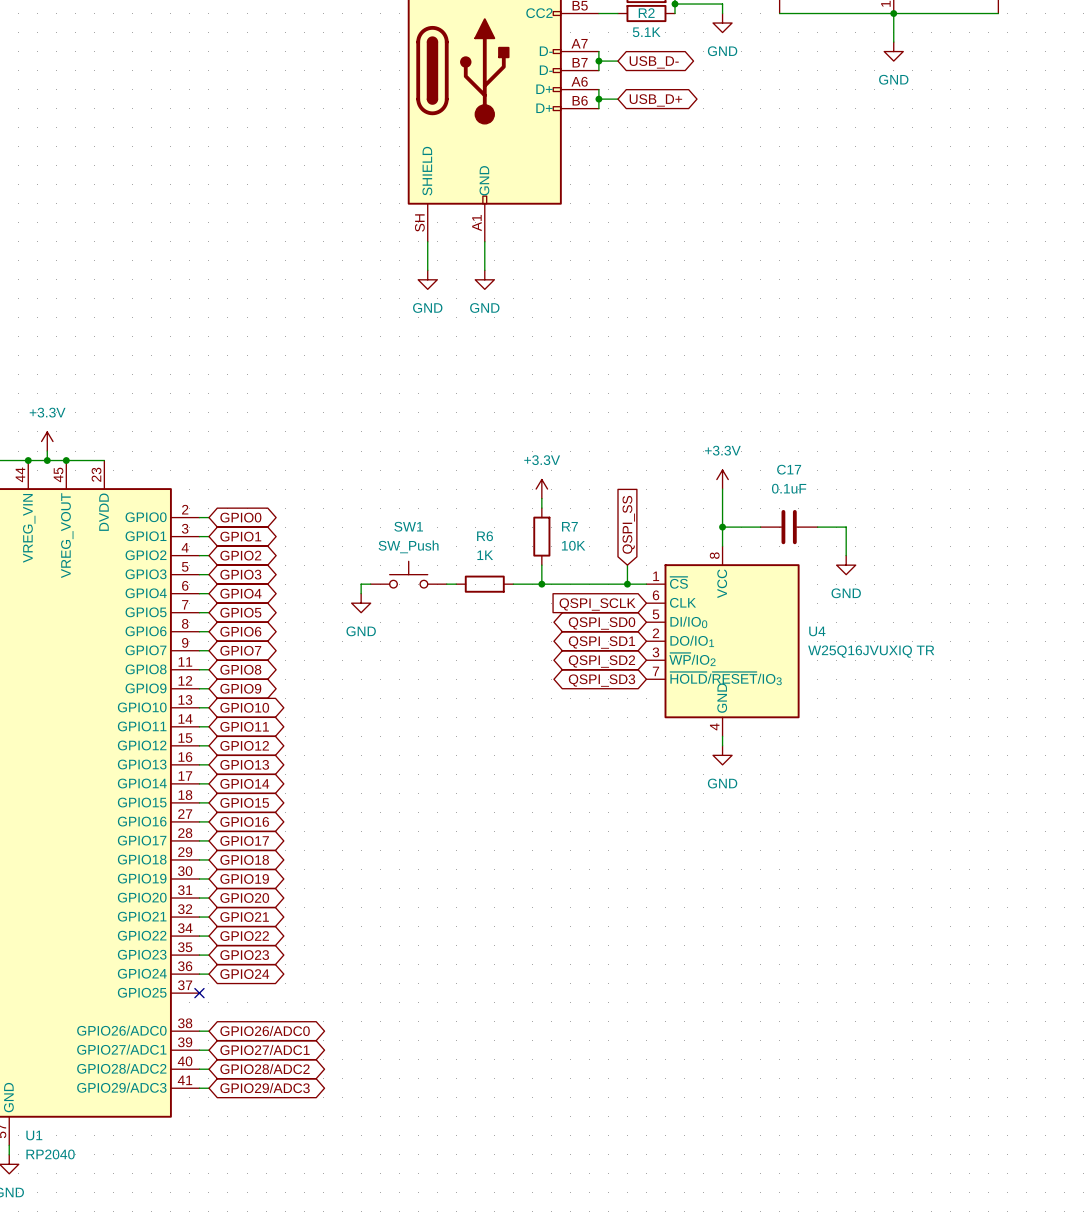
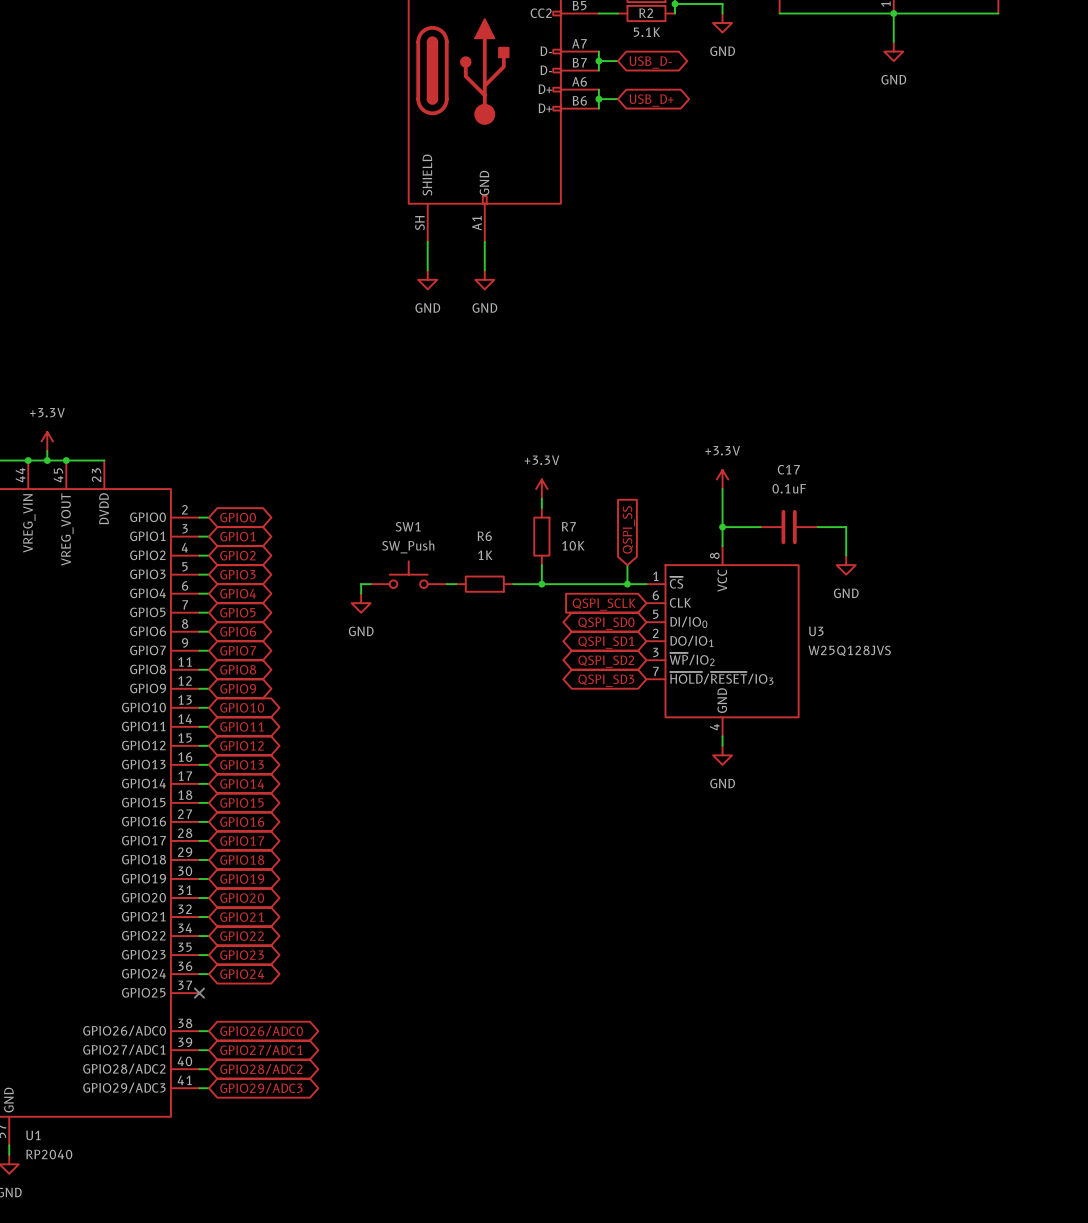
U4 name: U4 (817, 631) -> U3 (816, 631)
U4 value: W25Q16JVUXIQ TR (871, 651) -> W25Q128JVS (849, 650)

